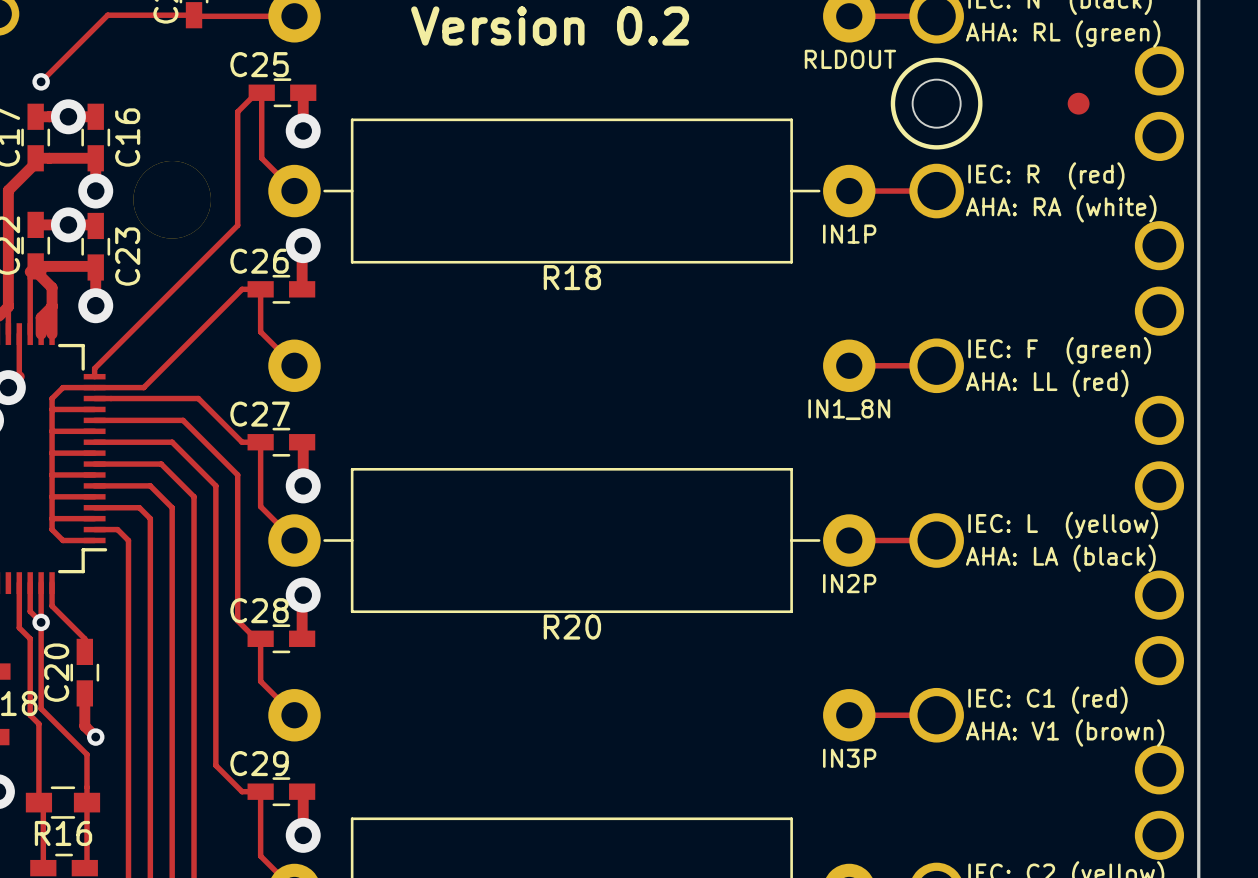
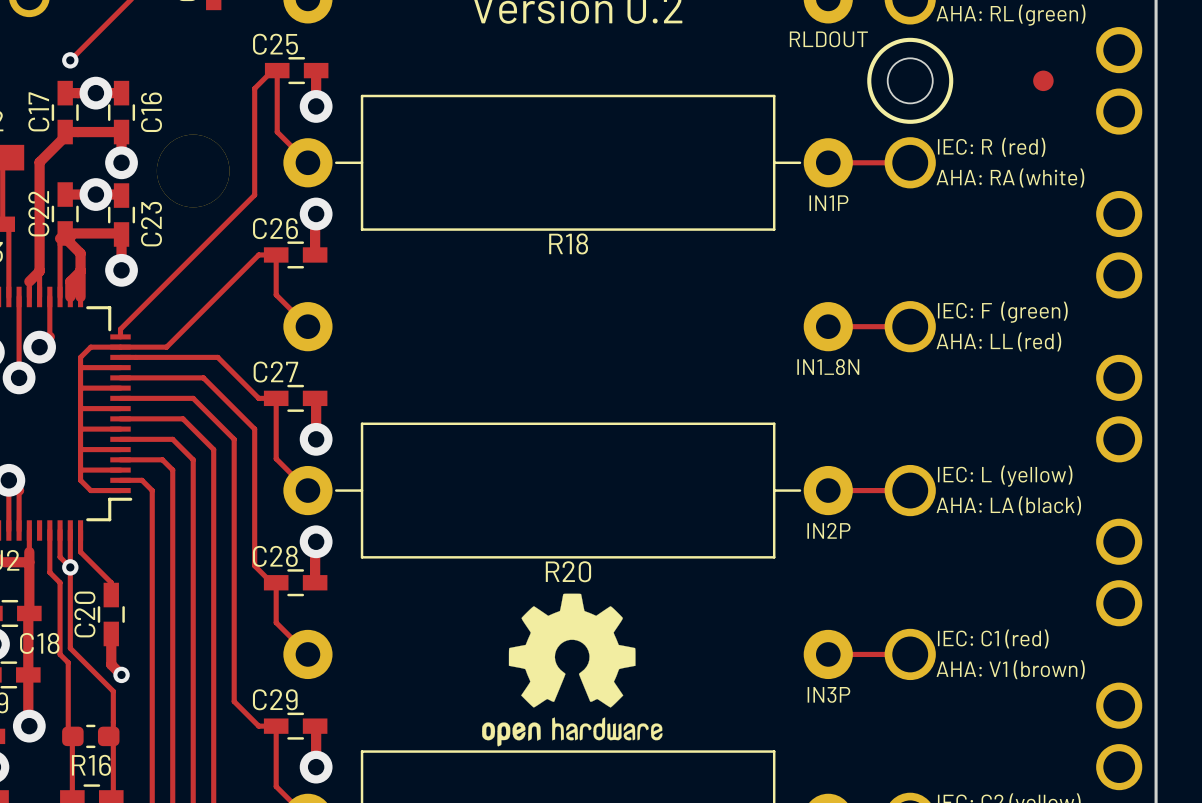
drawing: none -> [482, 593, 663, 747]
R16 footprint: [25, 786, 101, 819] -> [62, 724, 120, 749]

